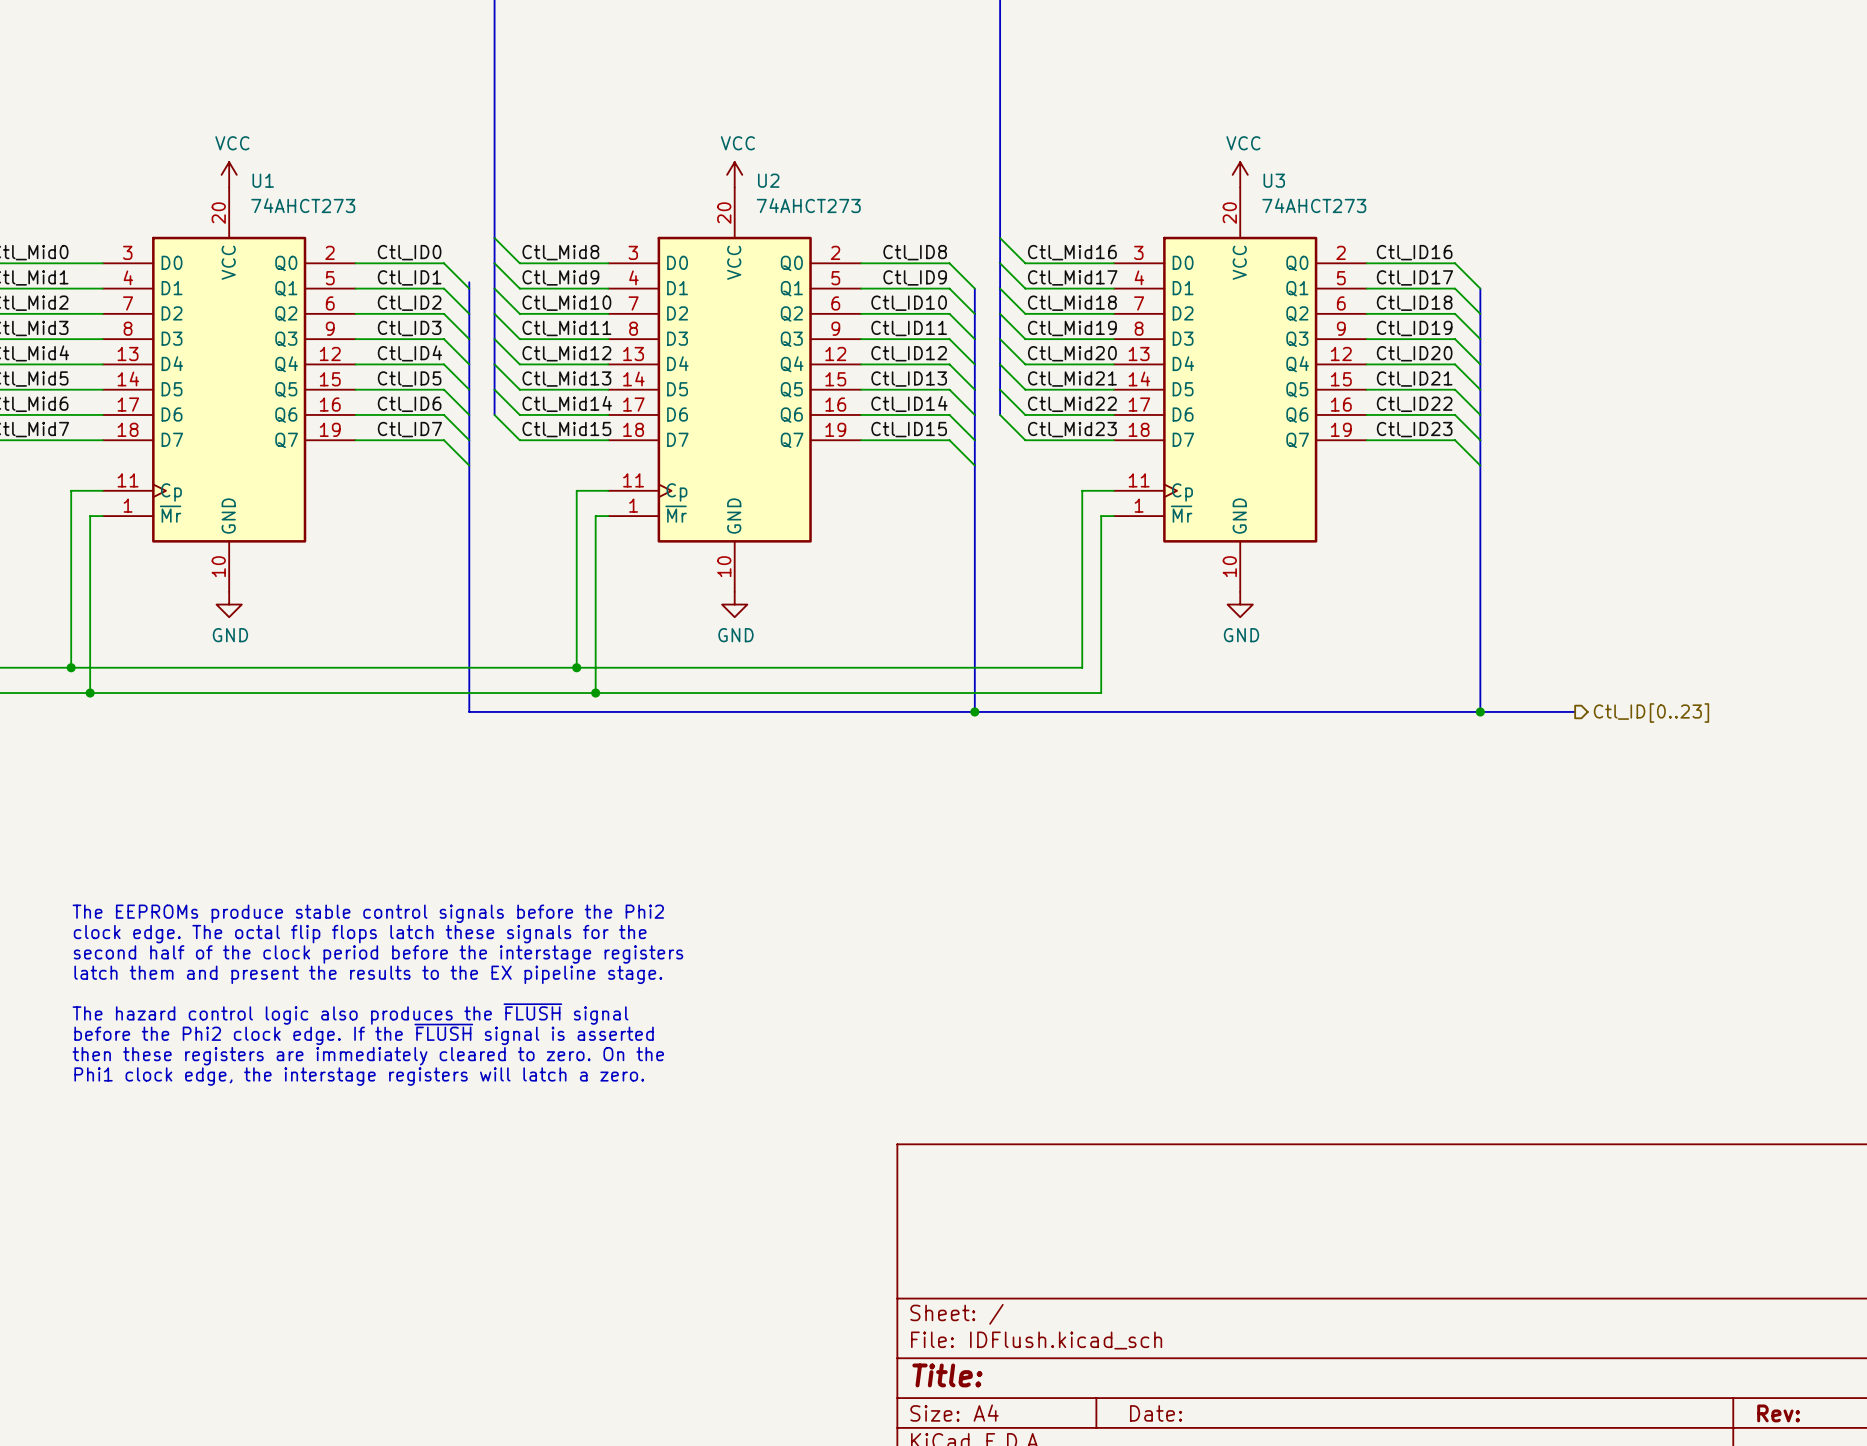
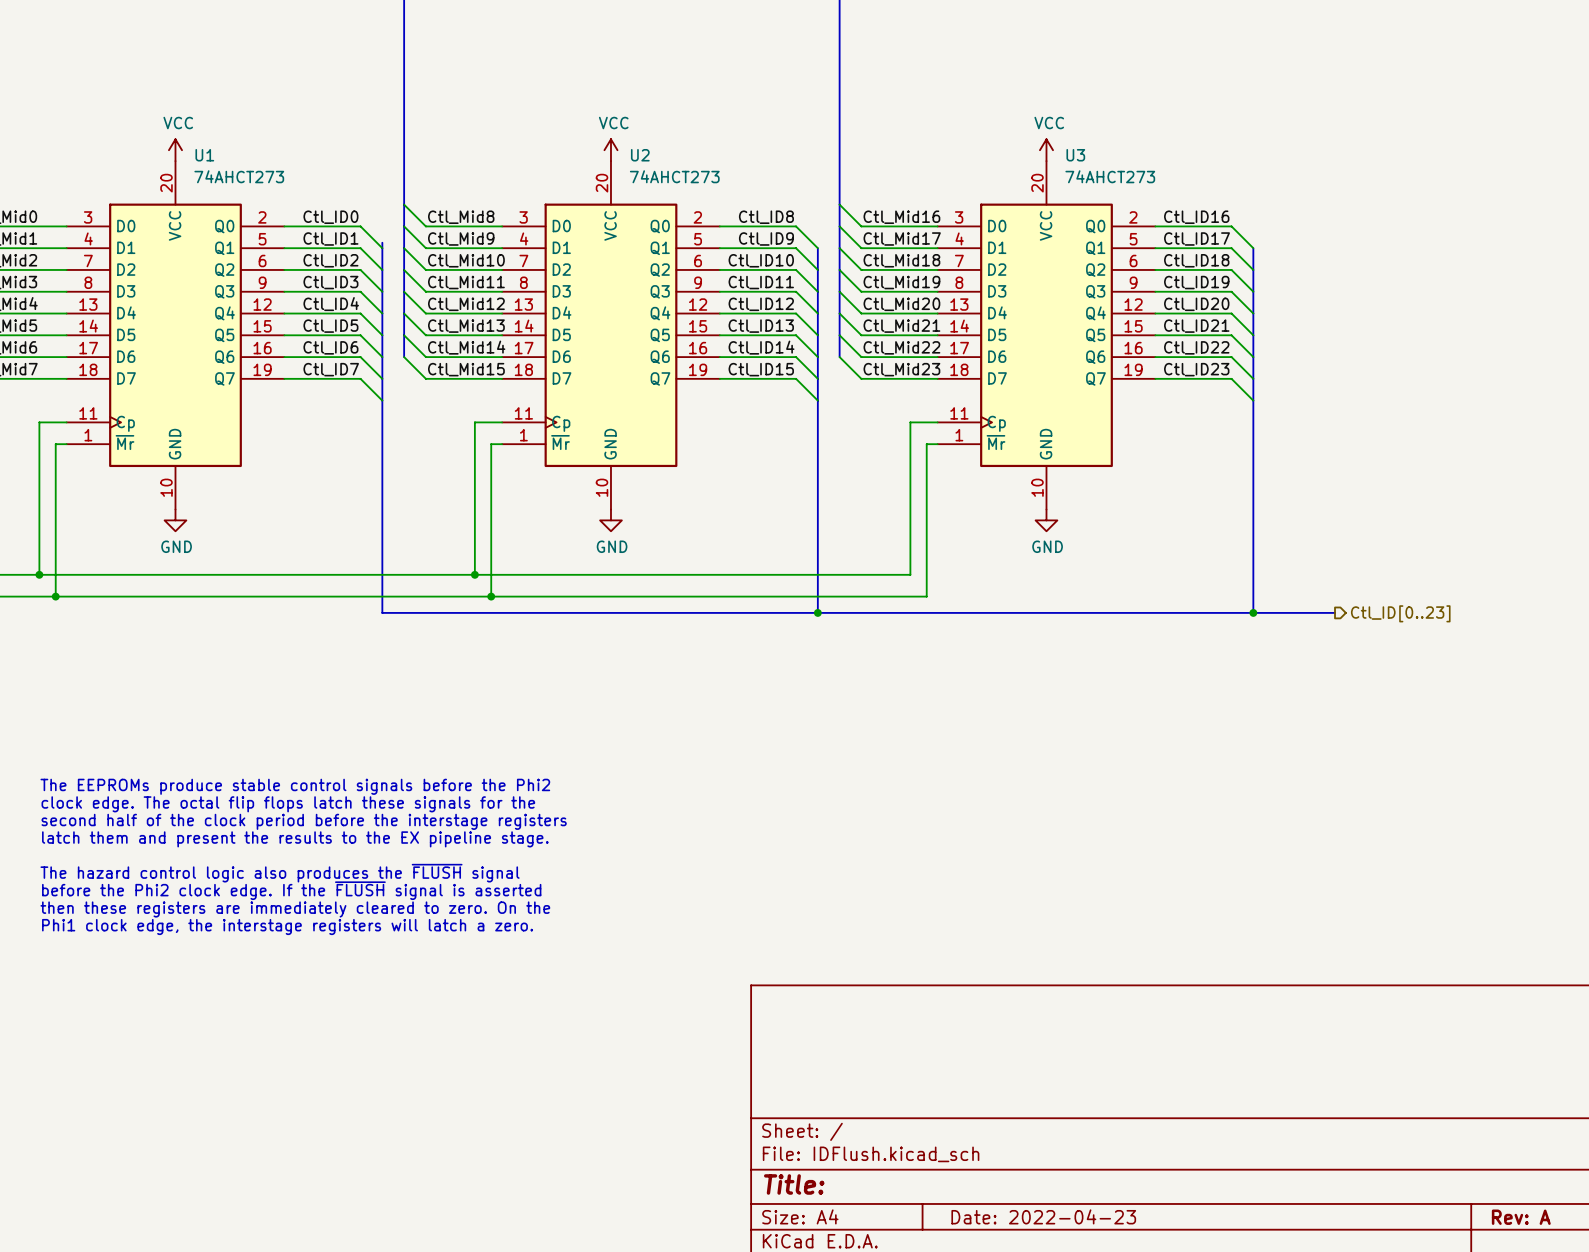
title block: Date: (1156, 1413) -> Date: 2022-04-23 (1043, 1216)
title block: Rev: (1778, 1413) -> Rev: A (1521, 1217)

